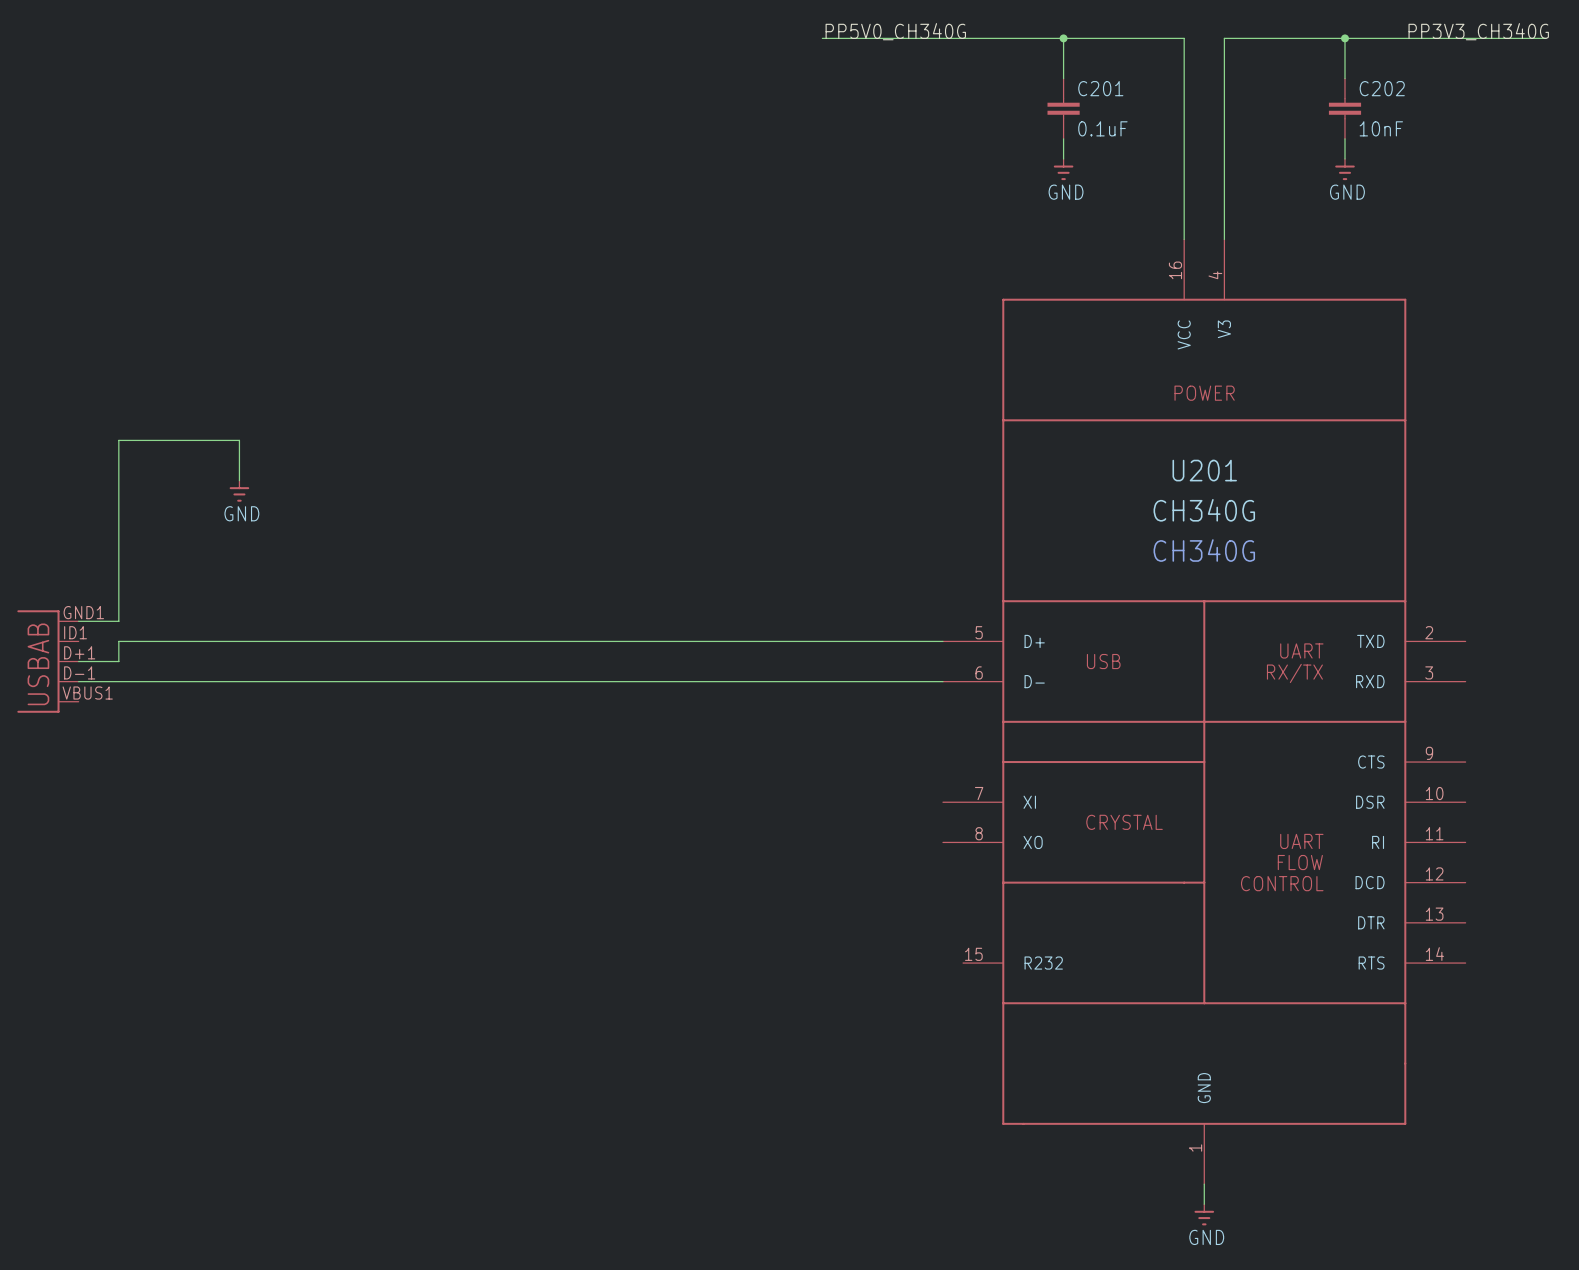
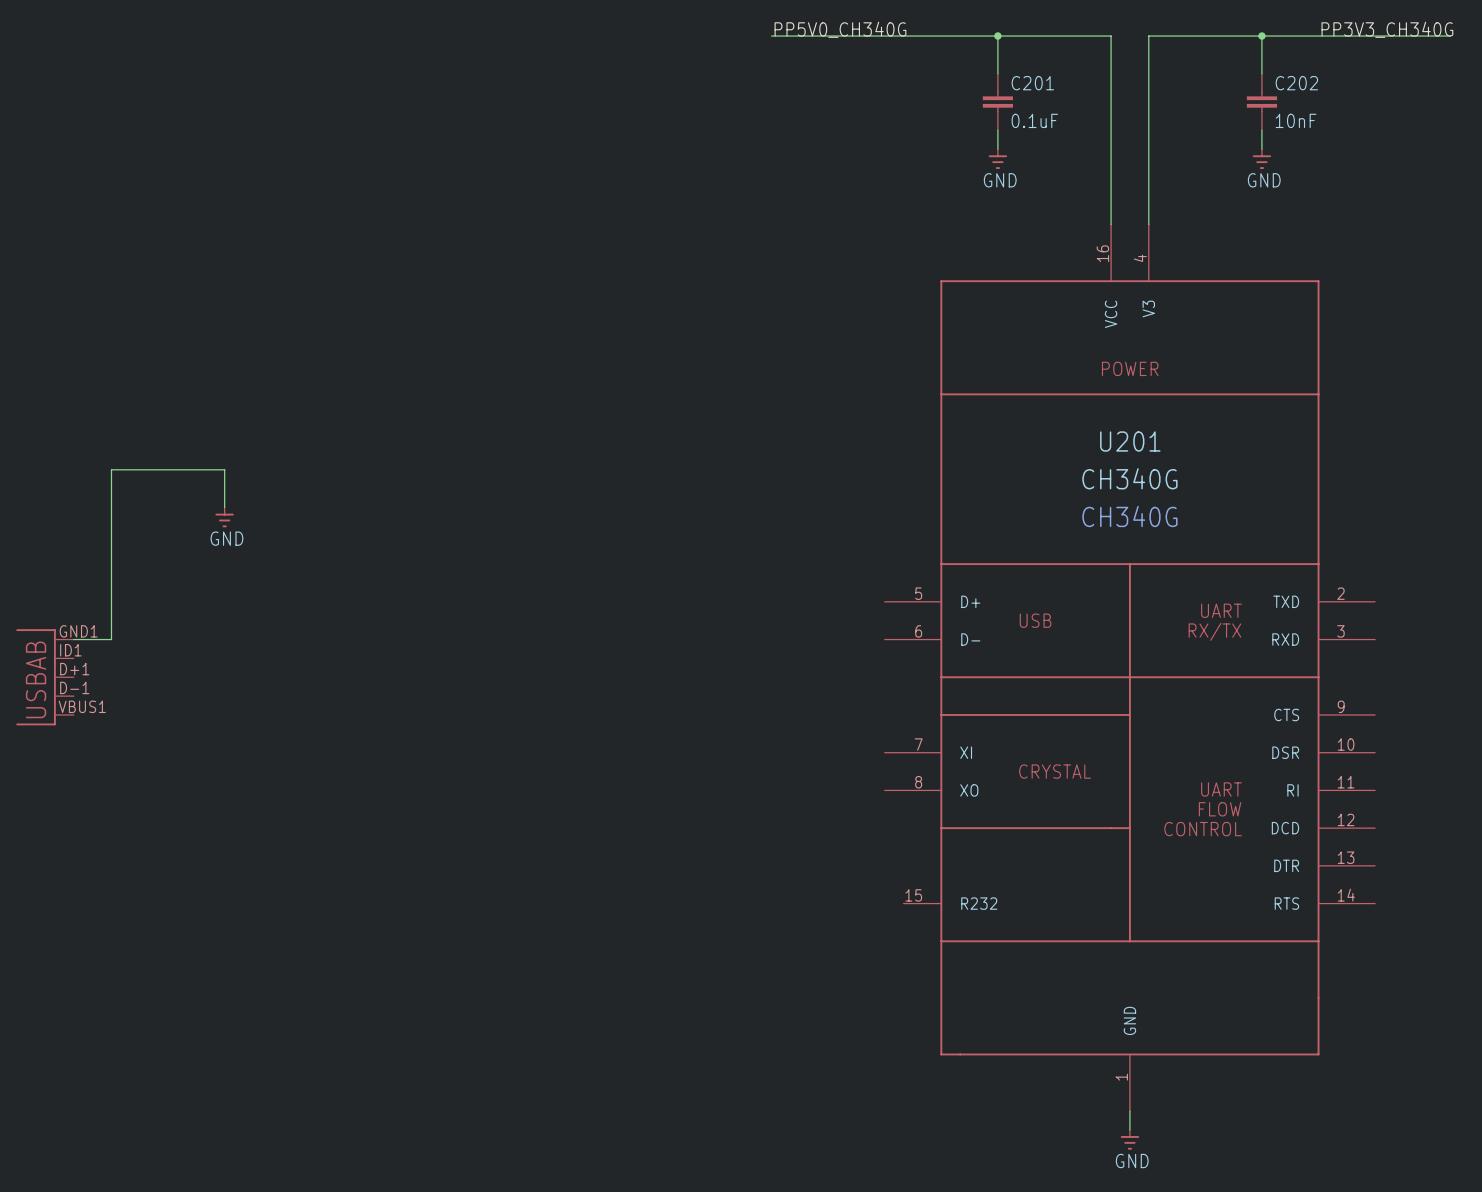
wire: (239, 480) (239, 440) (118, 440) (118, 500) -> (224, 507) (224, 469) (111, 469)
power symbol position: GND (239, 490) -> GND (224, 517)
wire: (78, 621) (118, 621) -> (111, 601) (111, 582)
wire: (118, 641) (942, 641) -> none
part position: (47, 661) -> (45, 677)
wire: (78, 661) (118, 661) -> (111, 639) (111, 620)
wire: (118, 681) (942, 681) -> none

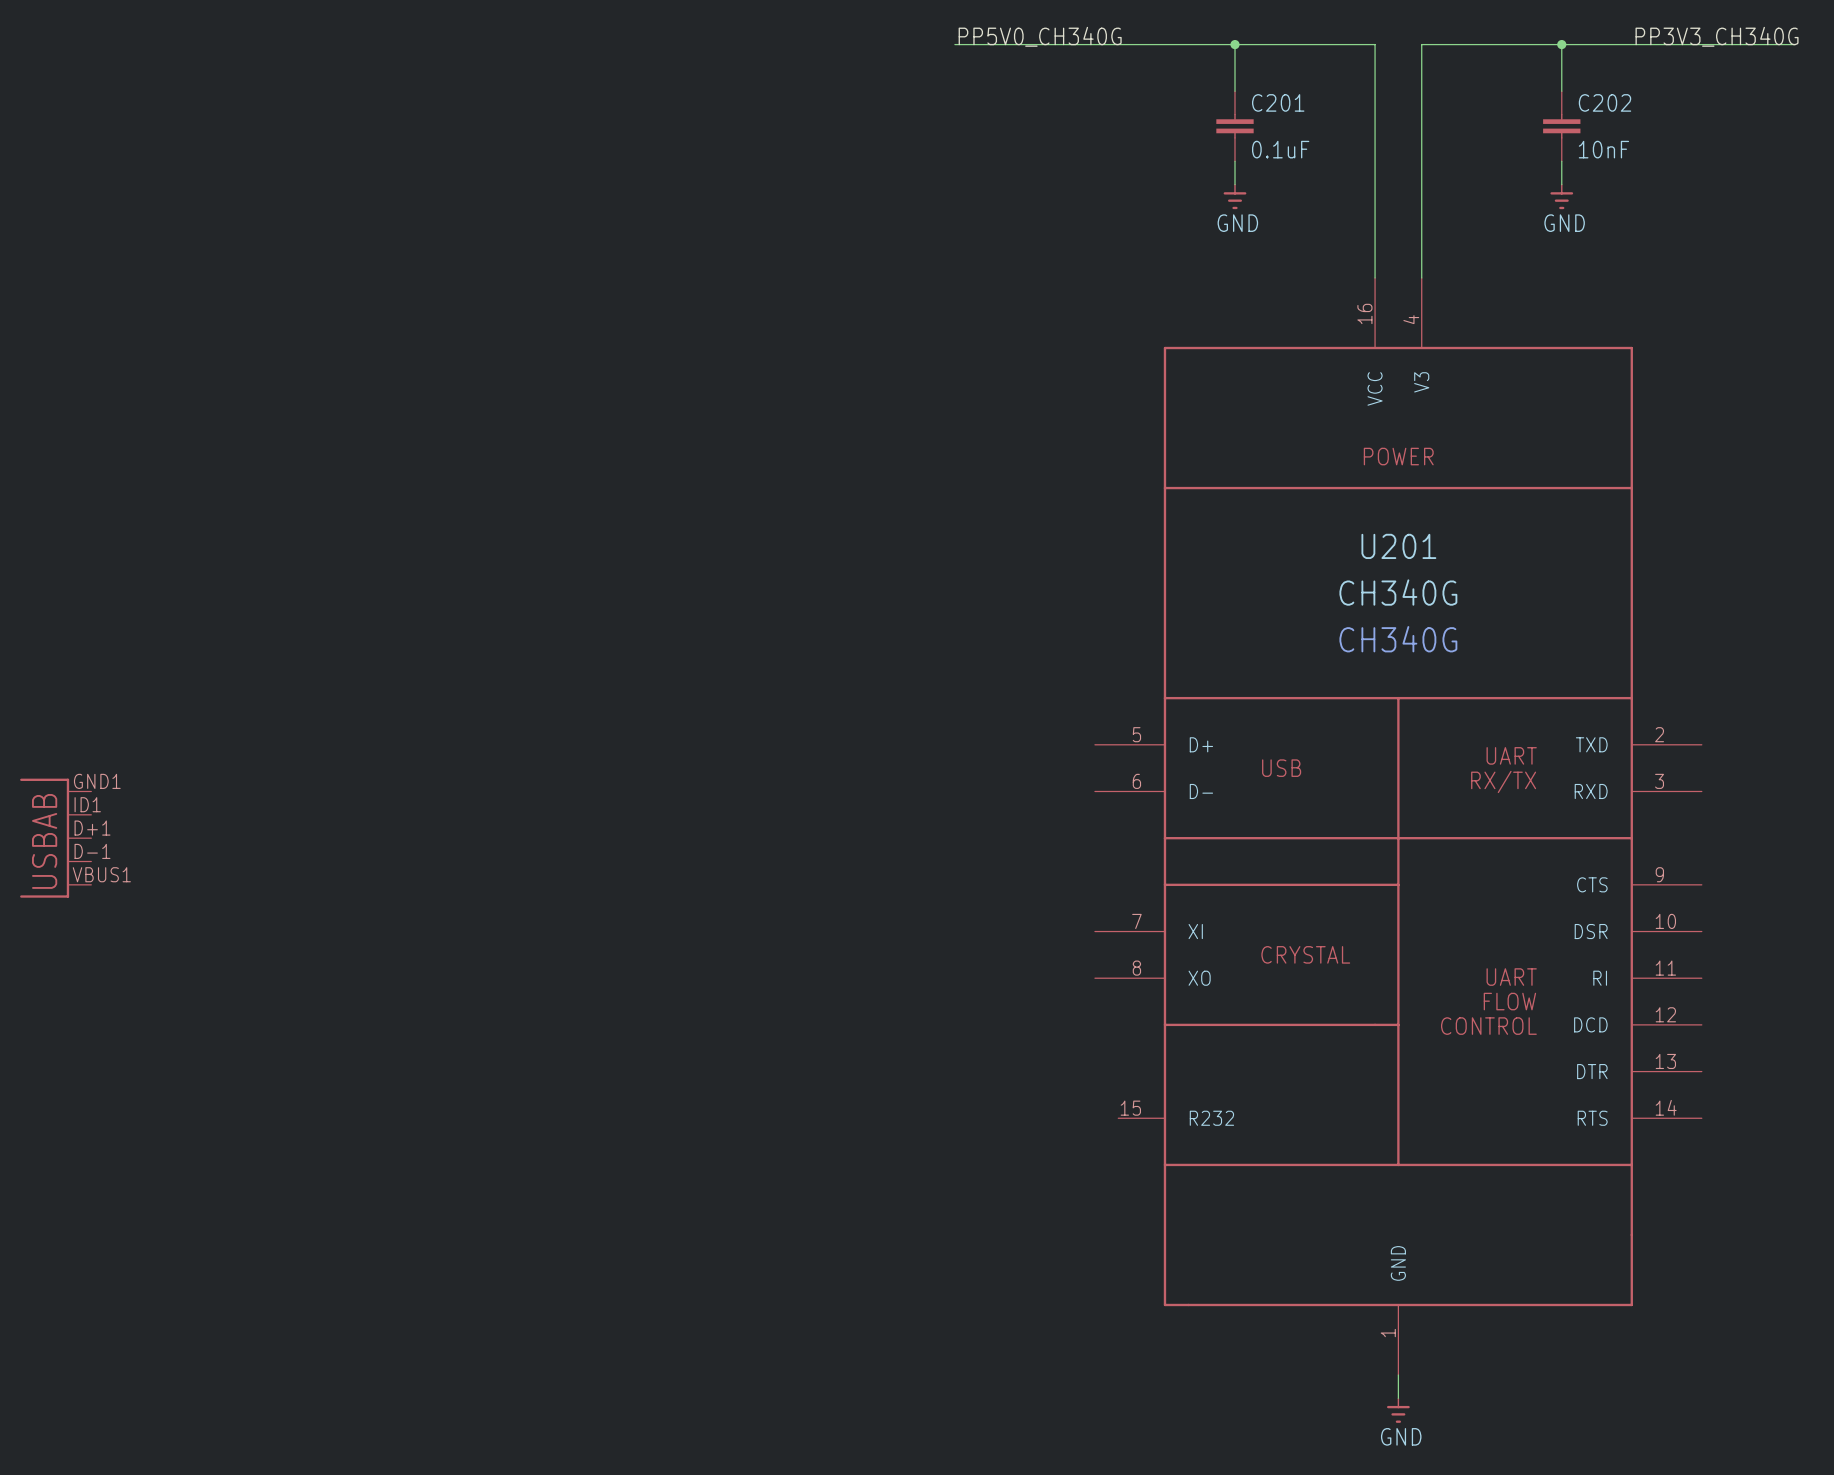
wire: (224, 507) (224, 469) (111, 469) (111, 639) (73, 639) -> none
power symbol: GND (224, 517) -> none

